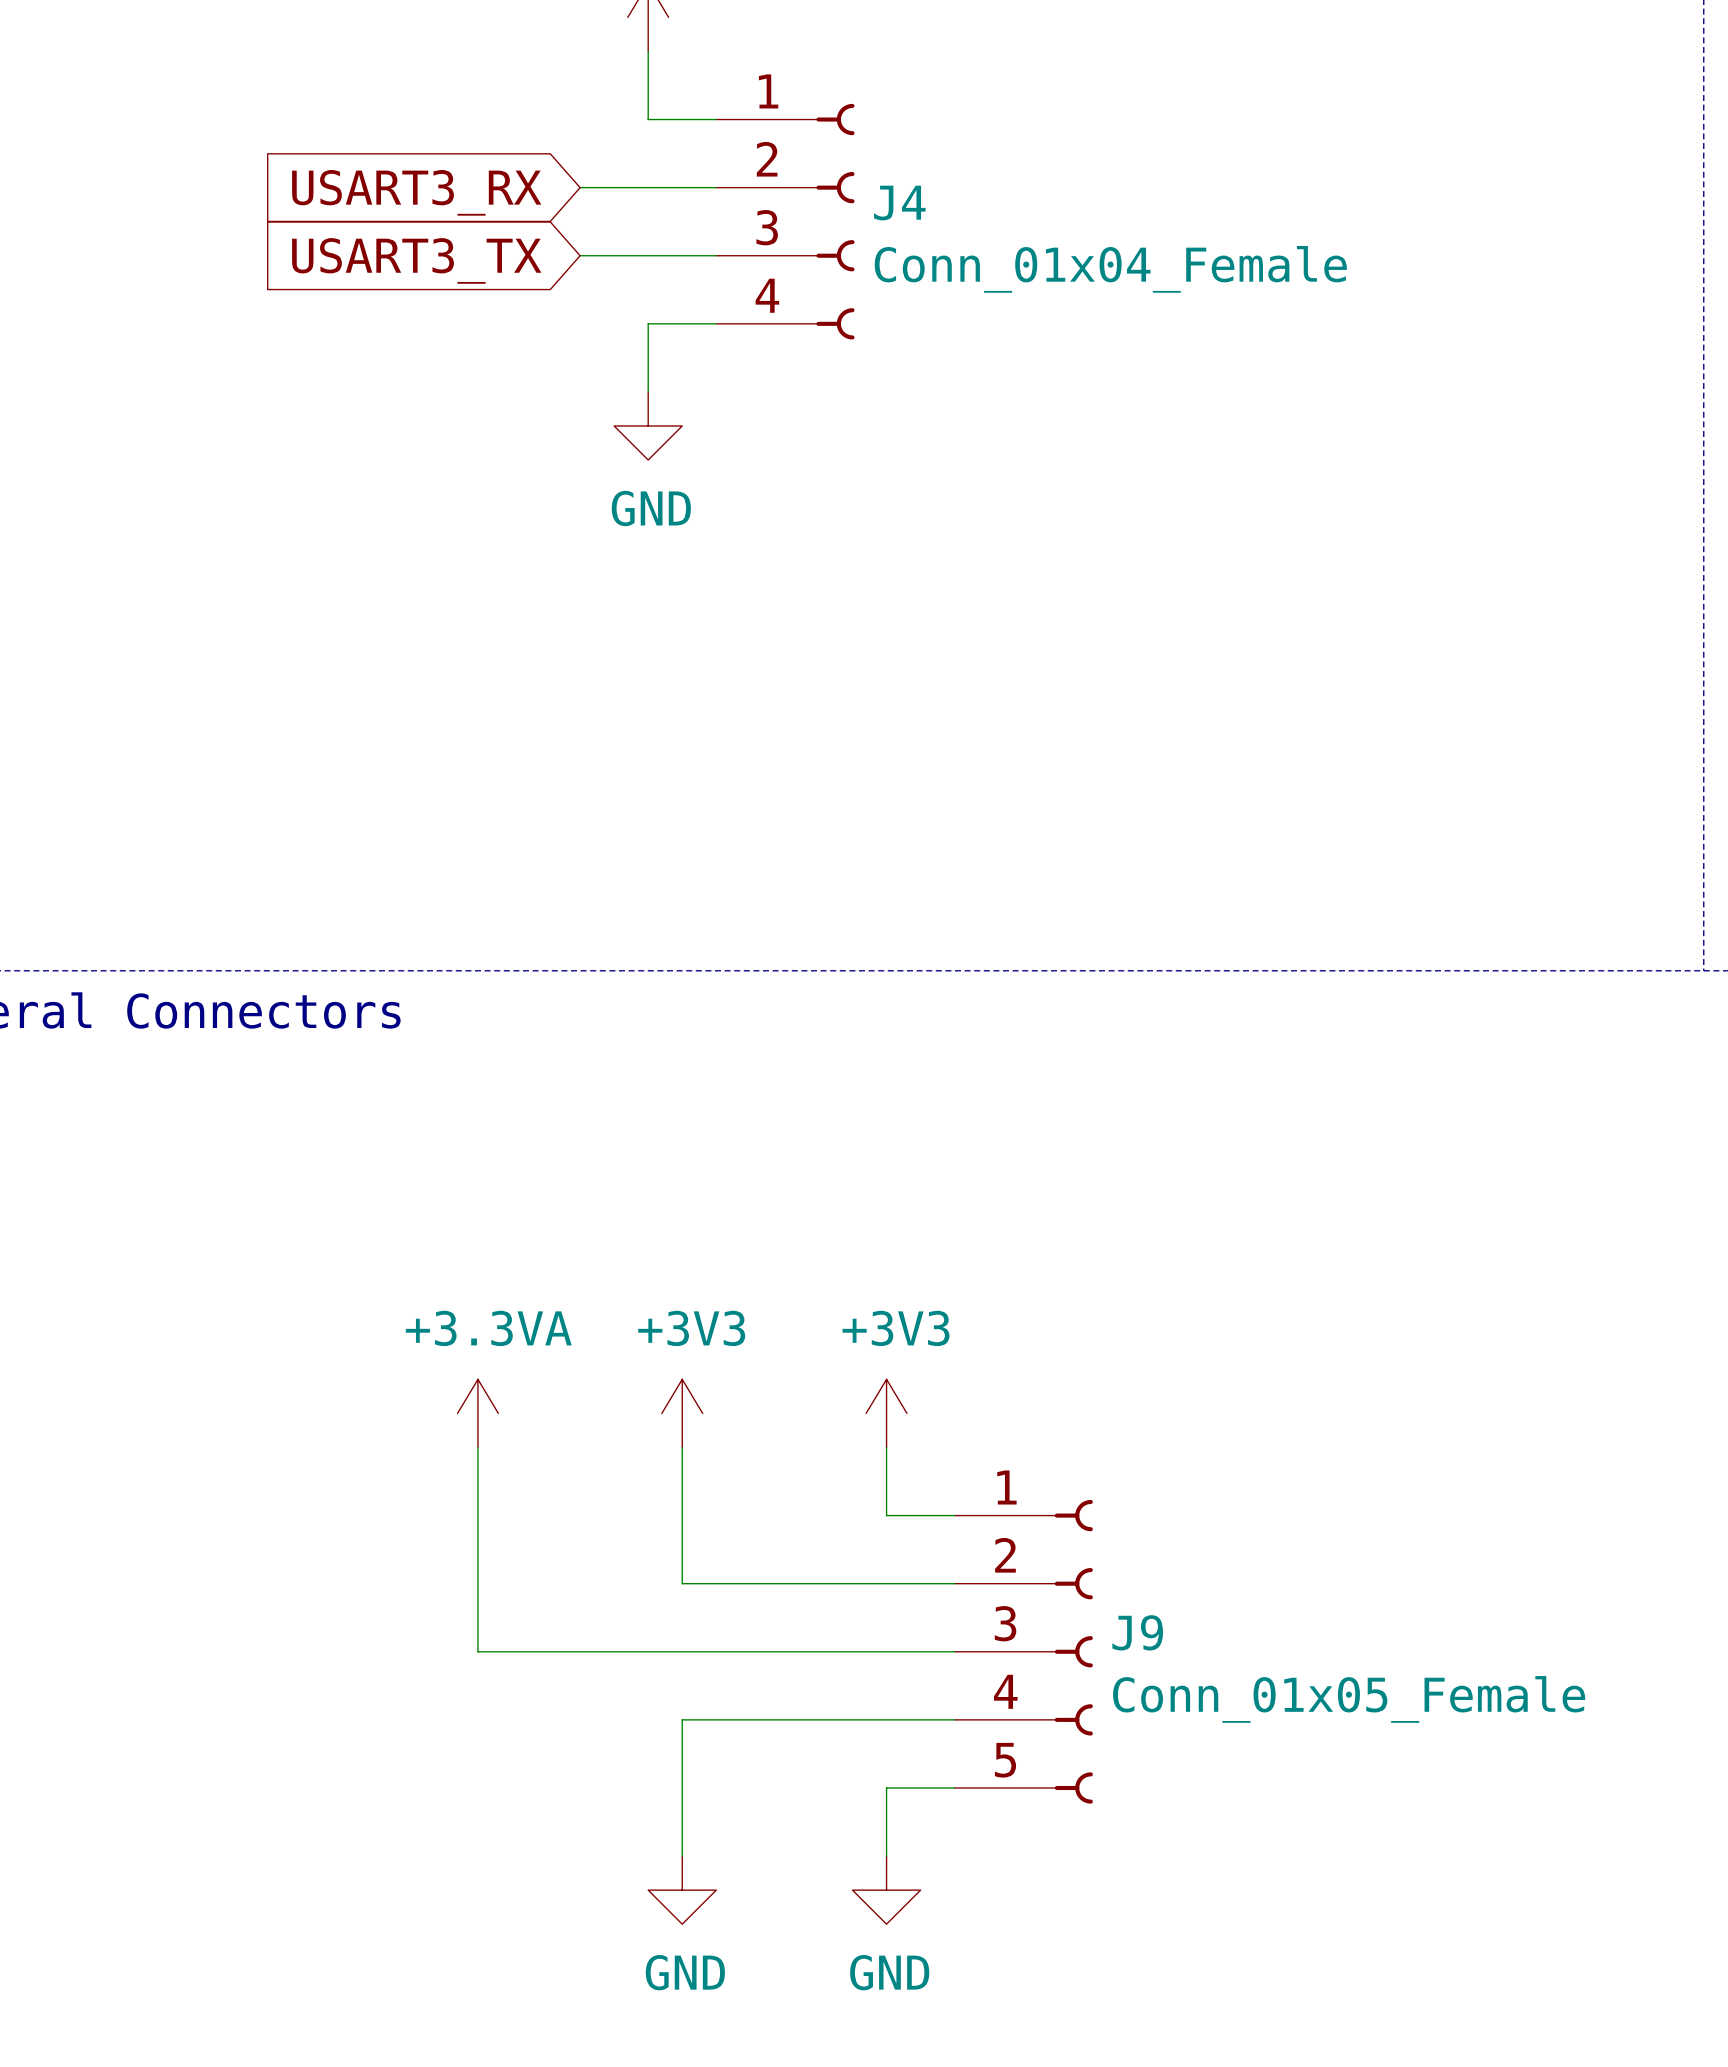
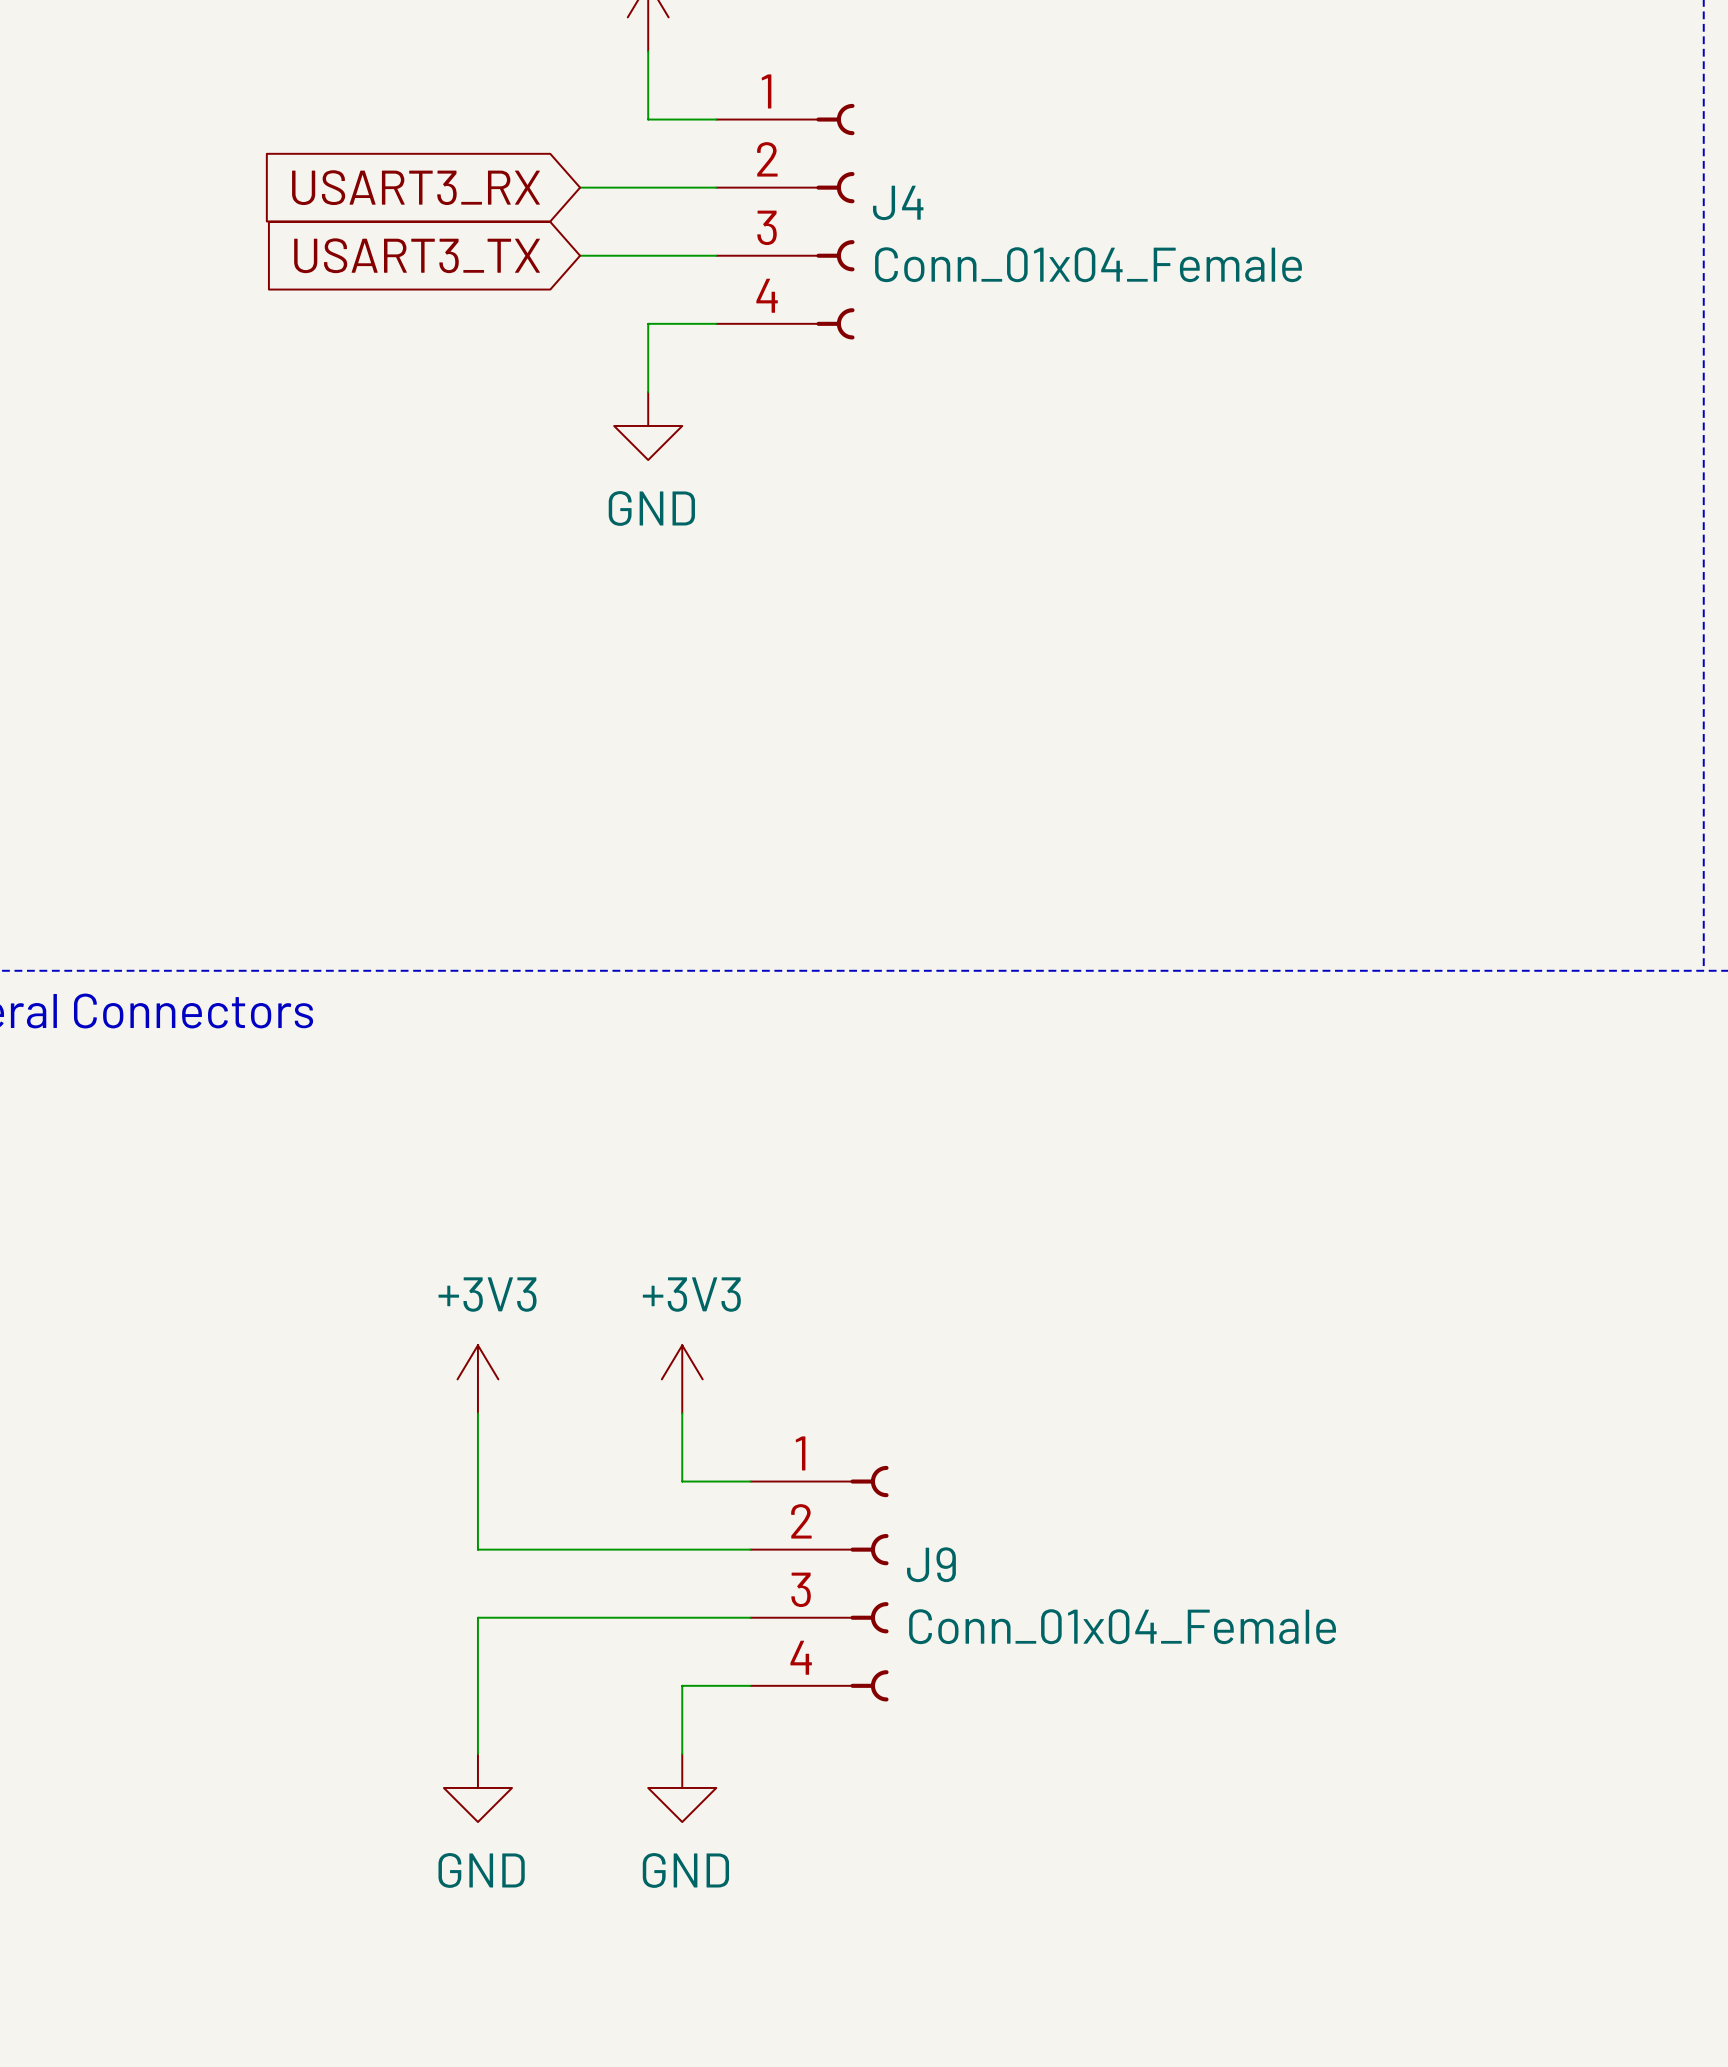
power symbol: none -> +3V3 (477, 1379)
power symbol: +3.3VA (477, 1413) -> none
power symbol position: +3V3 (682, 1413) -> +3V3 (682, 1379)
power symbol: +3V3 (886, 1413) -> none
wire: (886, 1447) (886, 1515) (954, 1515) -> none
wire: (682, 1481) (682, 1583) (954, 1583) -> (682, 1481) (750, 1481)
J9 symbol: [954, 1499, 1093, 1804] -> [750, 1465, 889, 1702]
wire: (477, 1549) (477, 1617) -> (477, 1549) (750, 1549)
wire: none -> (477, 1617) (750, 1617)
wire: (477, 1651) (954, 1651) -> (477, 1651) (477, 1753)
J9 value: Conn_01x05_Female (1349, 1699) -> Conn_01x04_Female (1122, 1626)
wire: (682, 1719) (954, 1719) -> (682, 1719) (682, 1685) (750, 1685)
wire: (682, 1753) (682, 1856) -> none
power symbol: none -> GND (477, 1787)
wire: (954, 1787) (886, 1787) (886, 1856) -> none
power symbol position: GND (682, 1890) -> GND (682, 1787)
power symbol: GND (886, 1890) -> none

